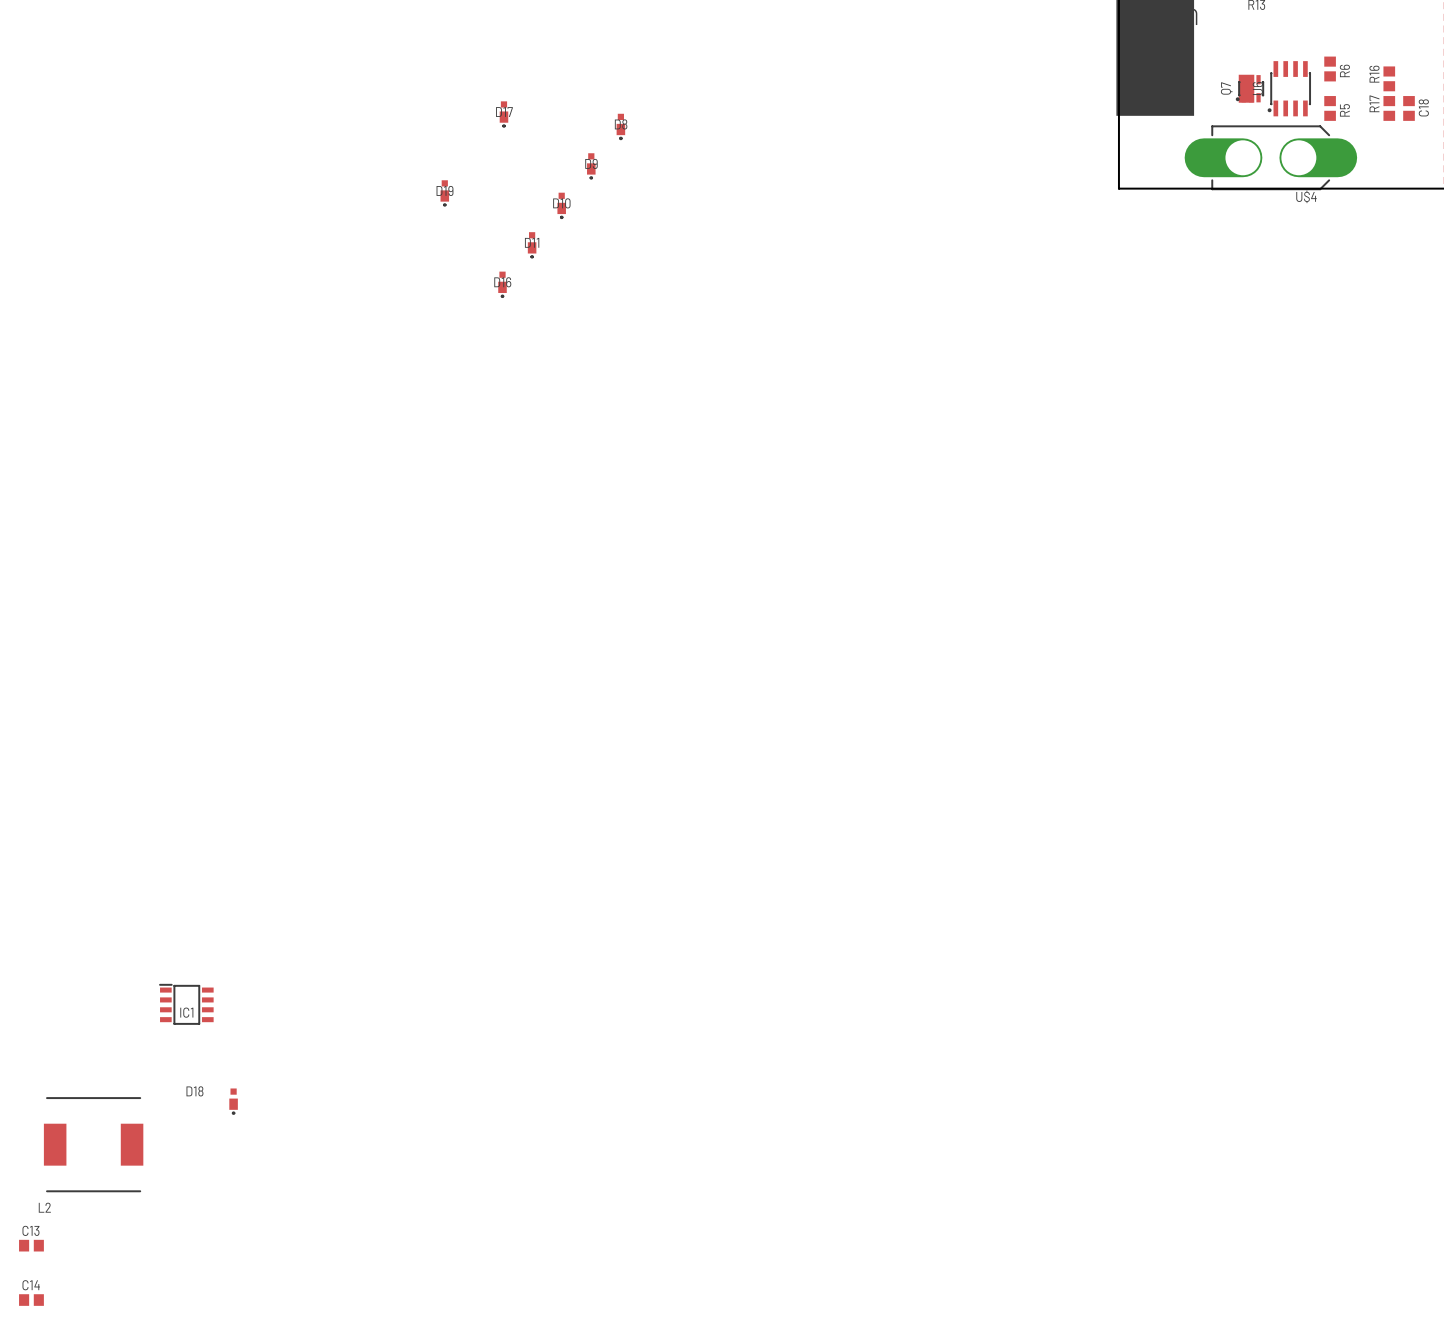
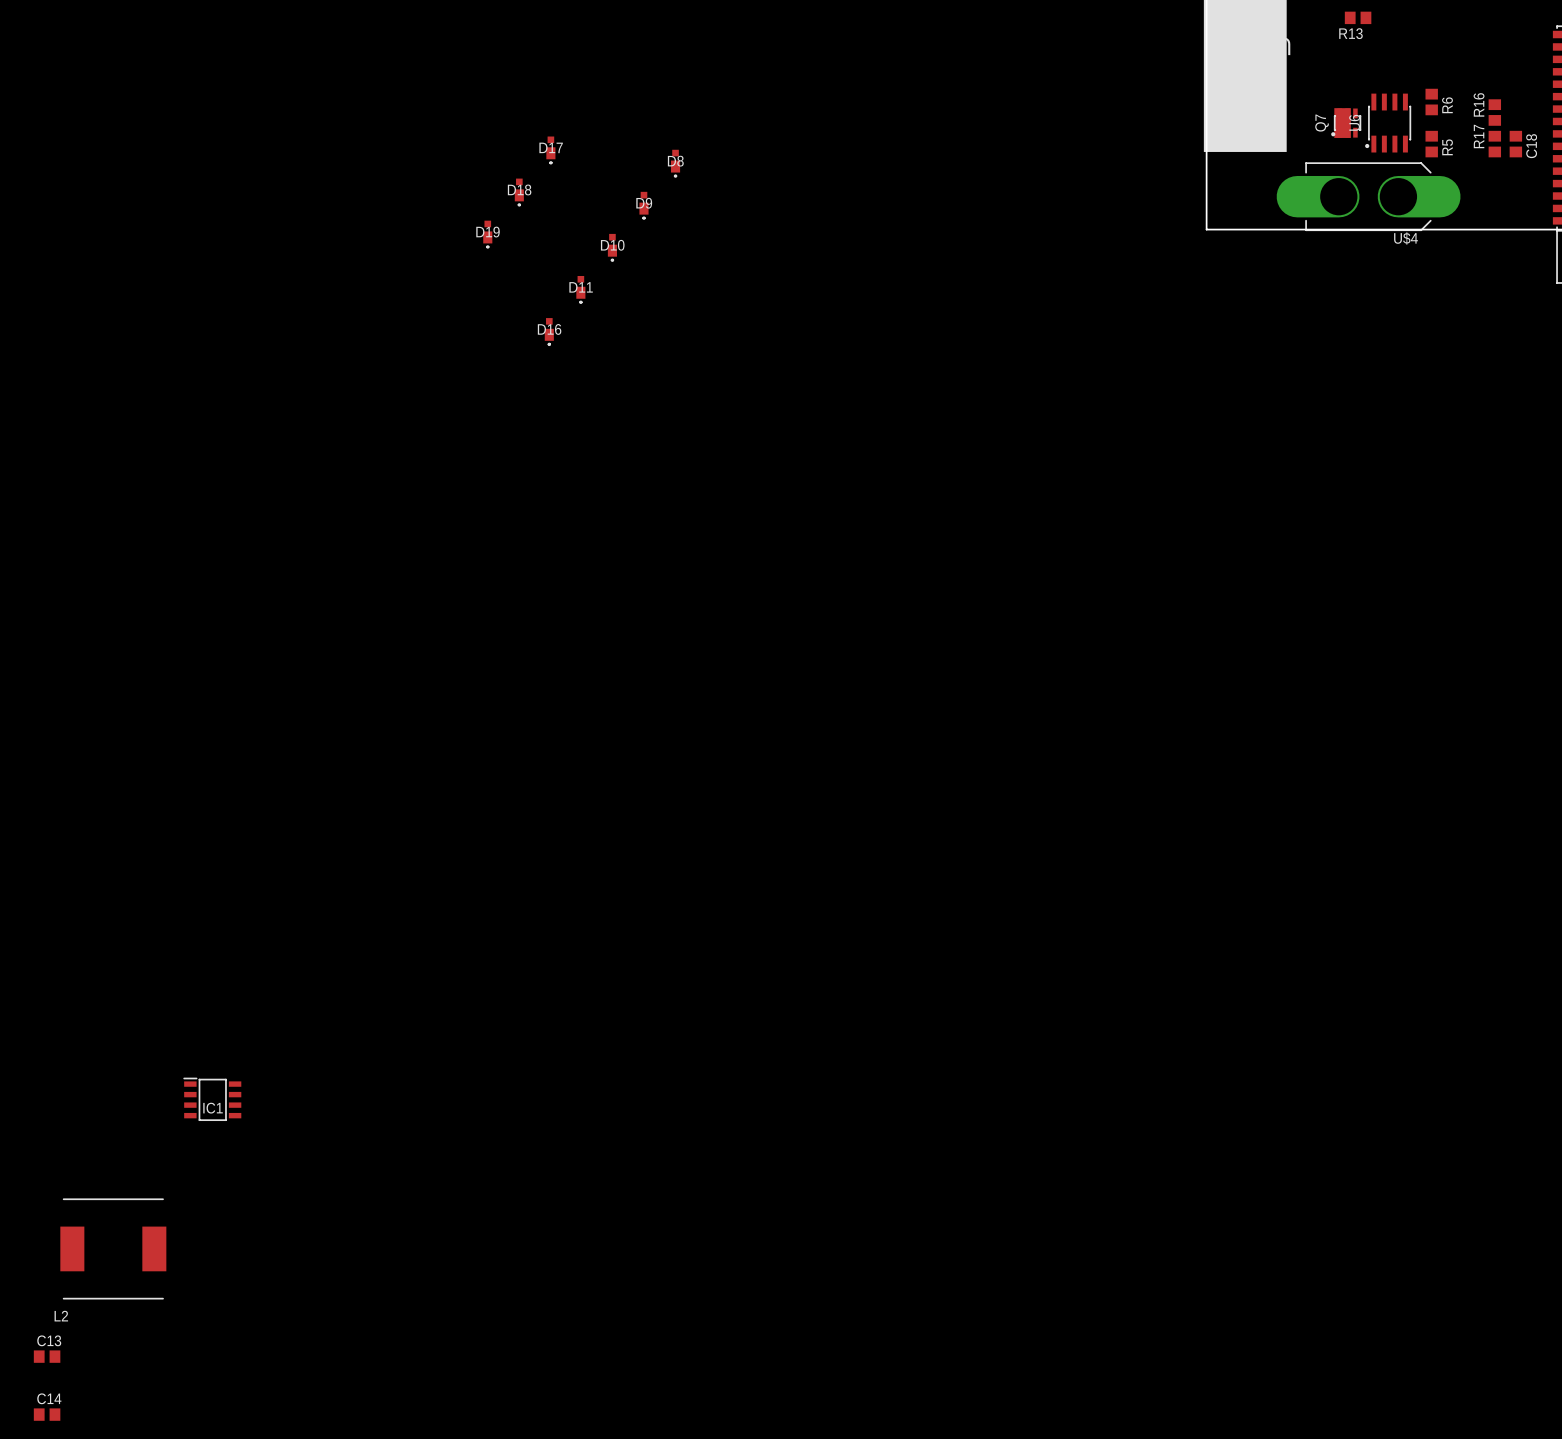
D18 name position: D18 (194, 1091) -> D18 (519, 189)
D18 position: (233, 1101) -> (519, 192)

